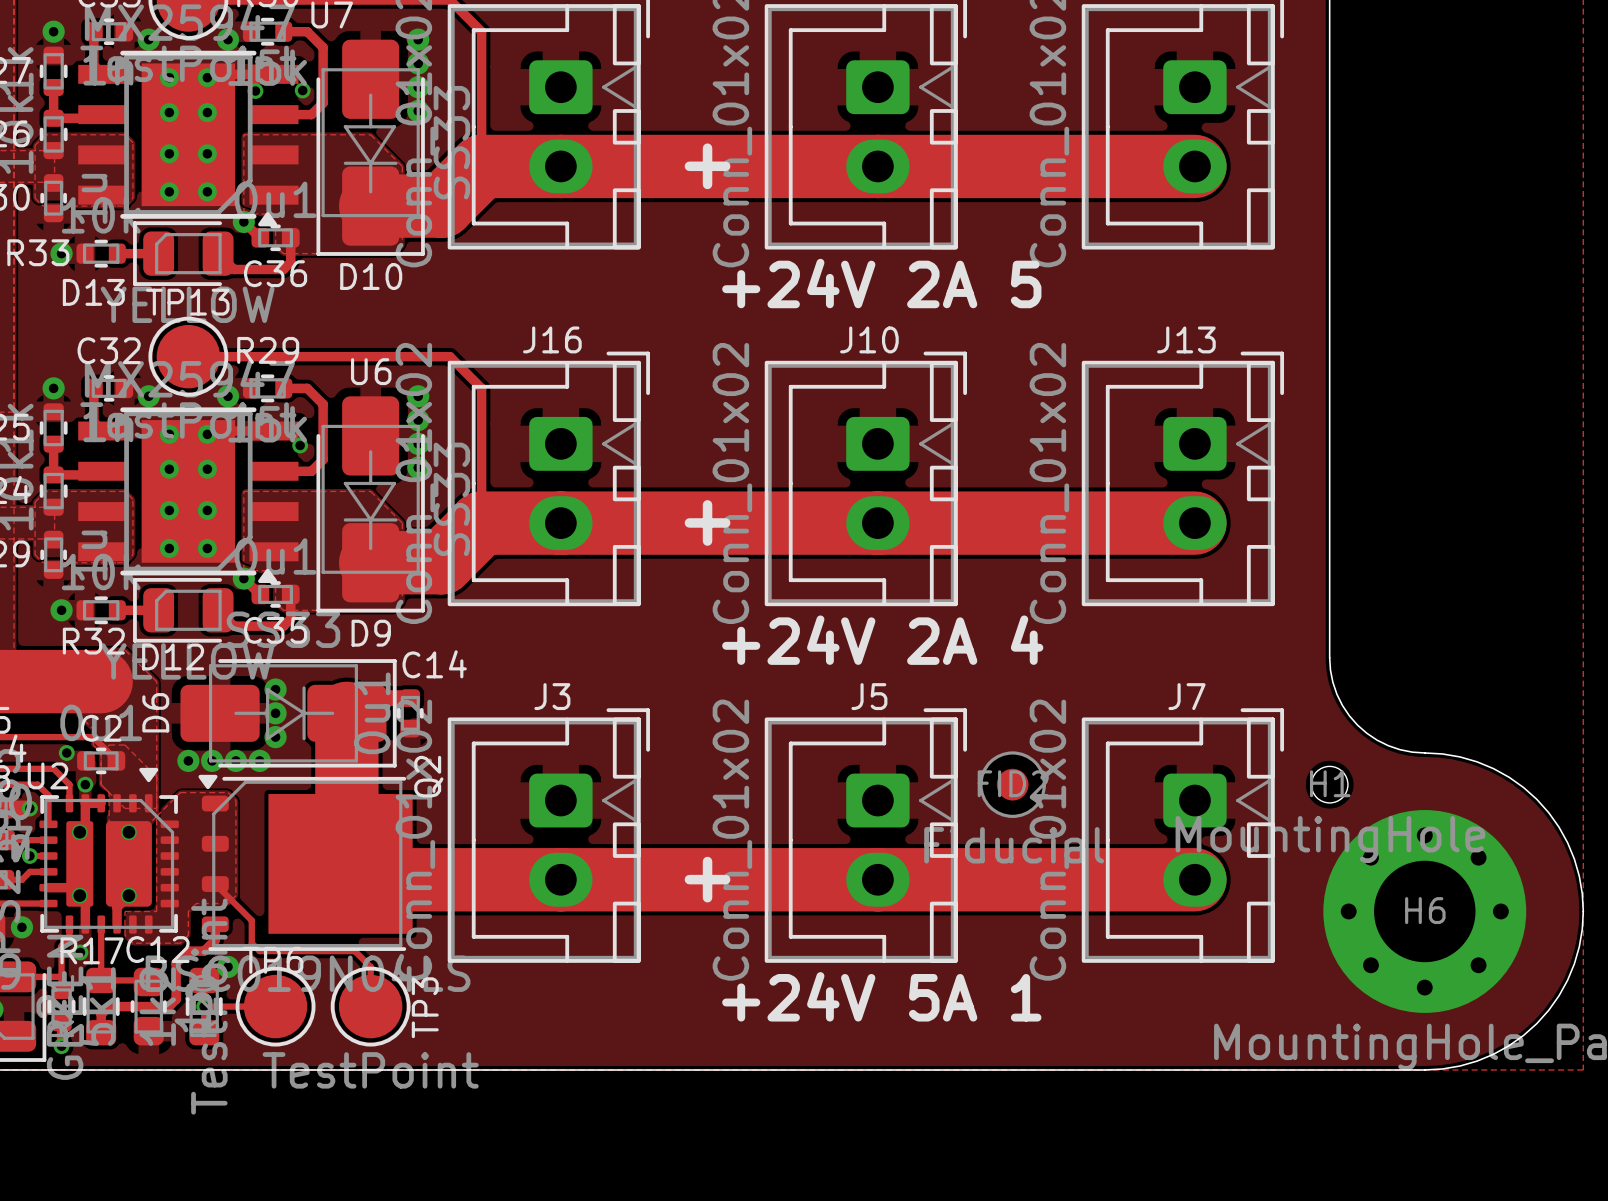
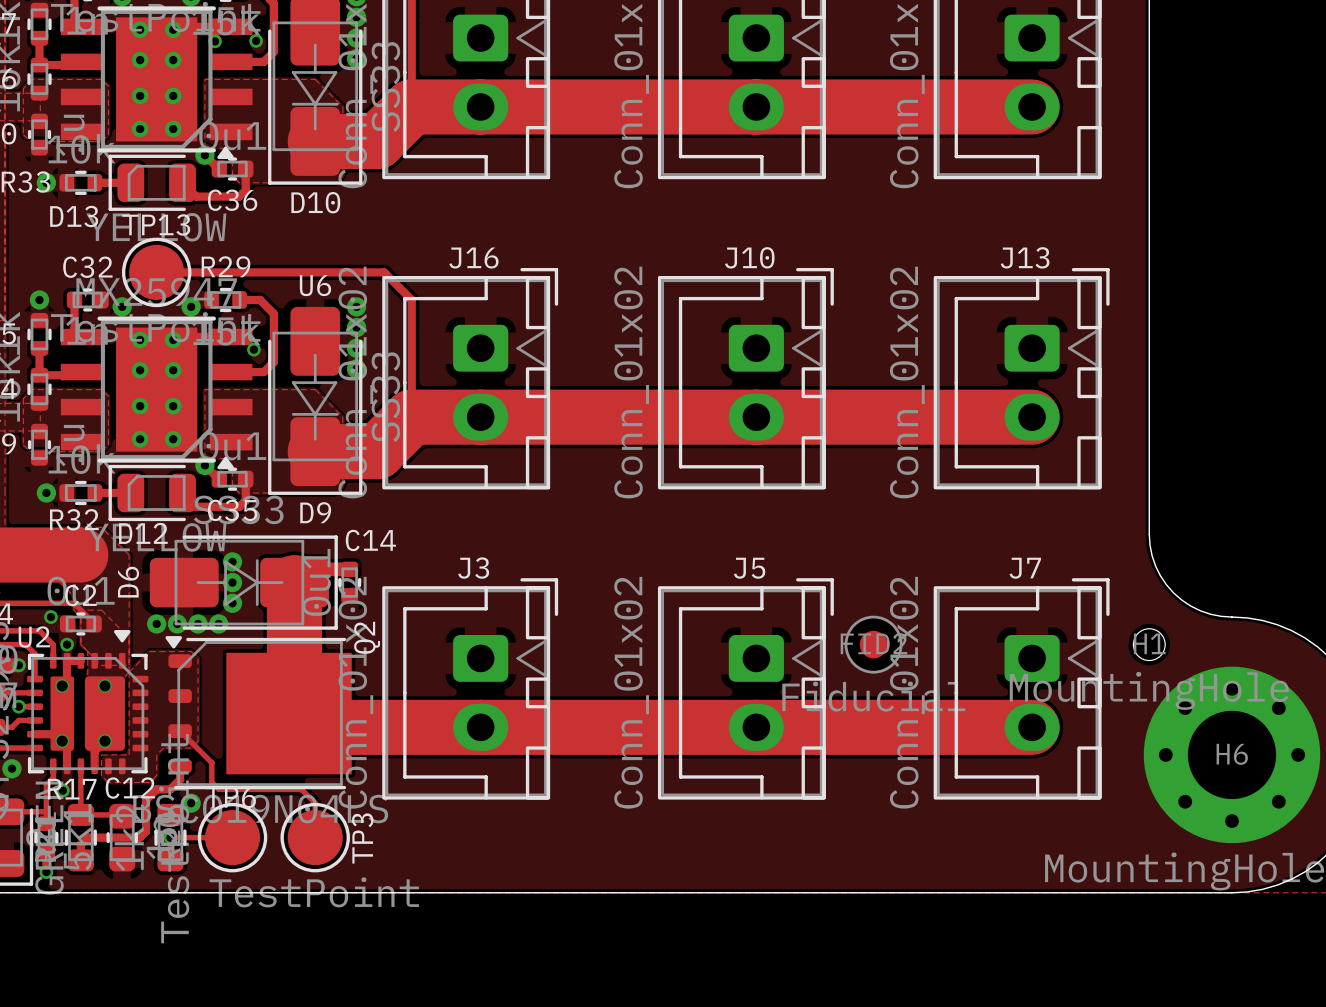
text: + (707, 166) -> none
text: +24V 2A 5 (881, 283) -> none
text: + (707, 522) -> none
text: +24V 2A 4 (882, 640) -> none
text: + (707, 879) -> none
text: +24V 5A 1 (881, 996) -> none

